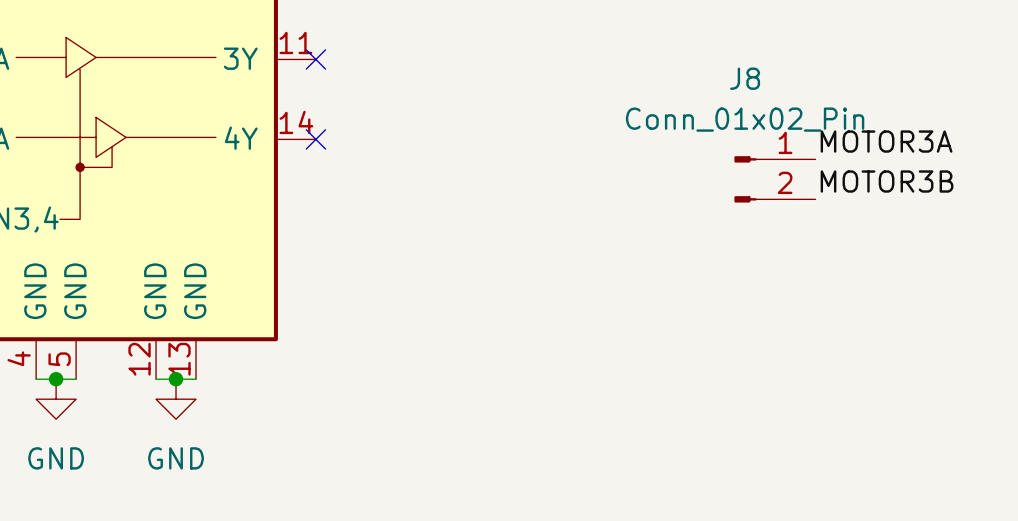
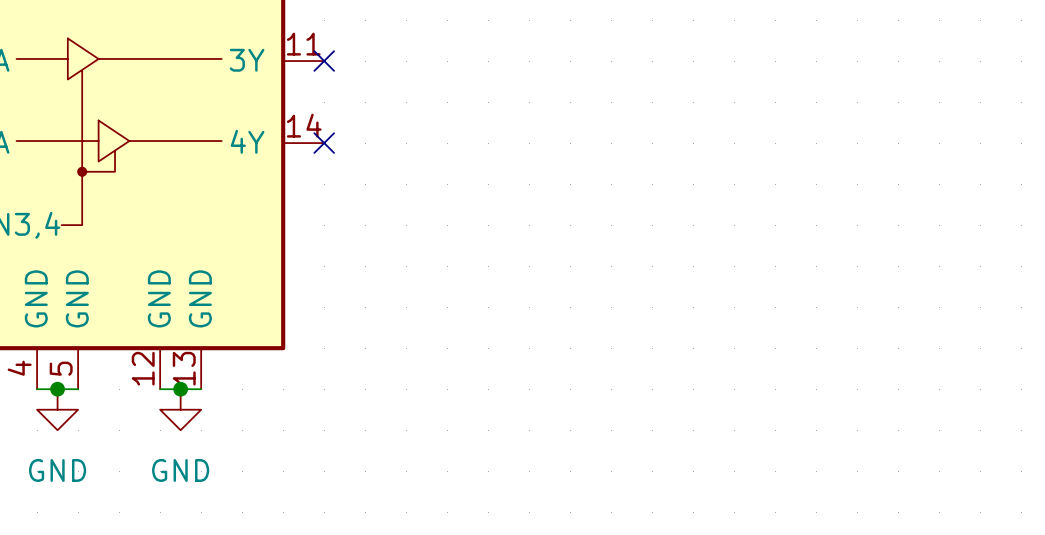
label: MOTOR3A (886, 141) -> none
J8: Conn_01x02_Pin (774, 179) -> none
label: MOTOR3B (887, 181) -> none

